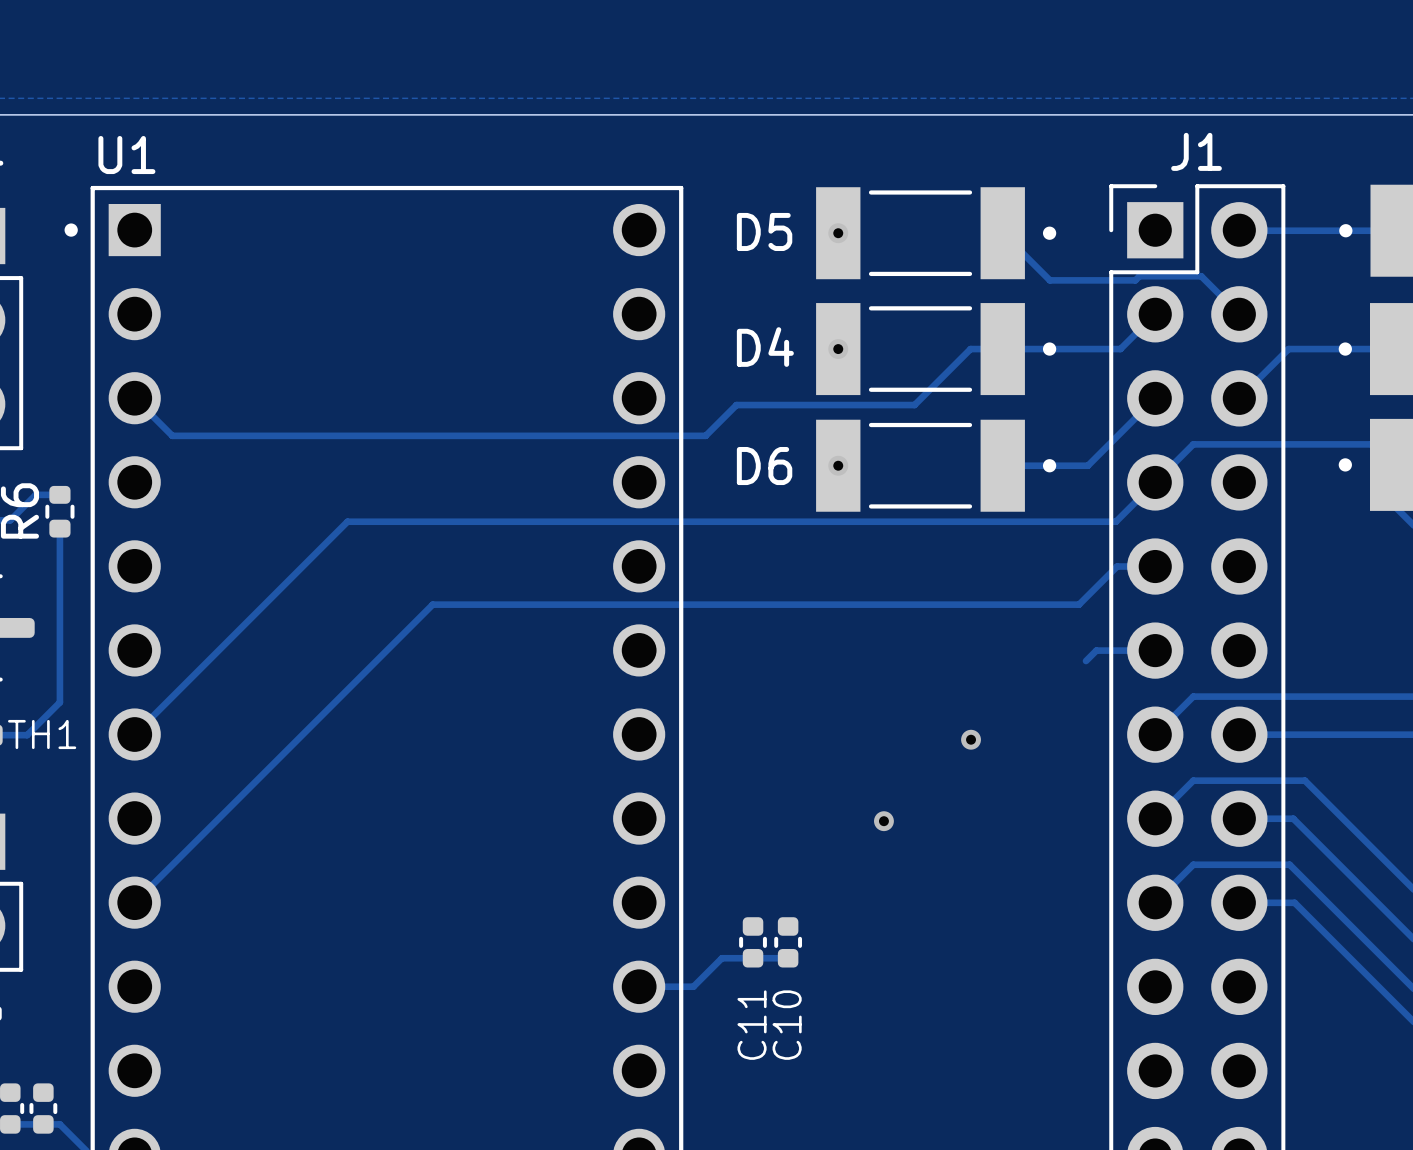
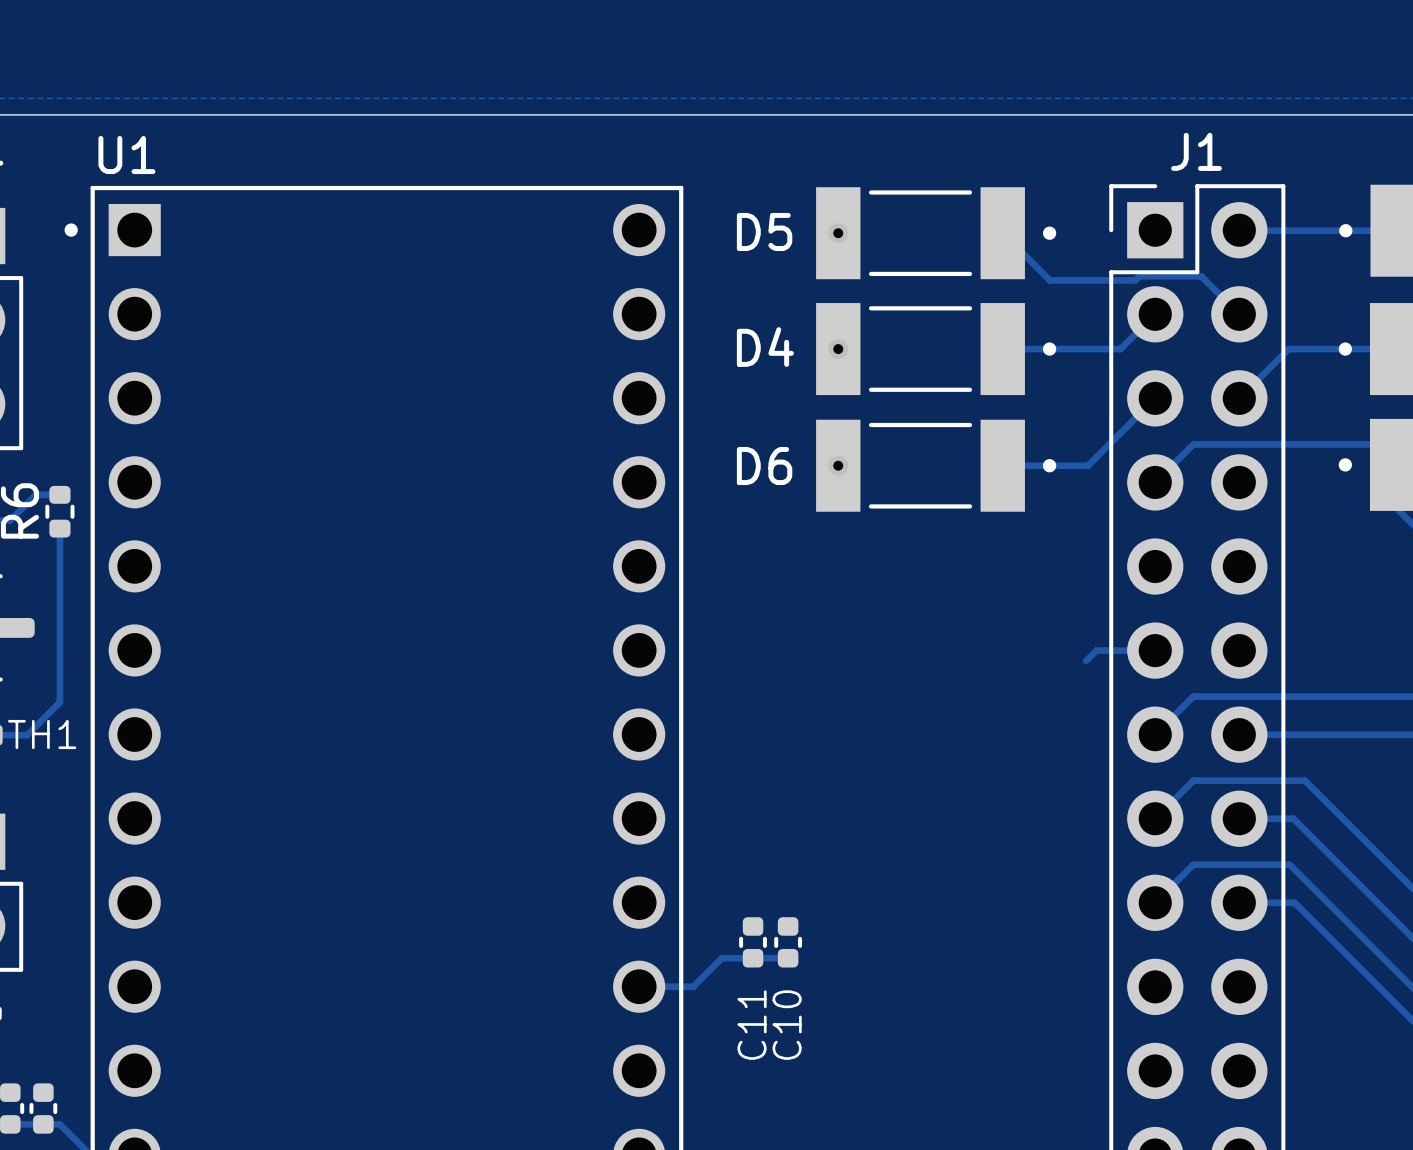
track: (1002, 349) (970, 349) (914, 405) (736, 405) (705, 435) (172, 435) (134, 398) -> none
track: (1155, 482) (1115, 521) (347, 521) (134, 734) -> none
track: (1155, 566) (1117, 566) (1079, 604) (432, 604) (134, 902) -> none
via: (971, 739) -> none
via: (883, 821) -> none

